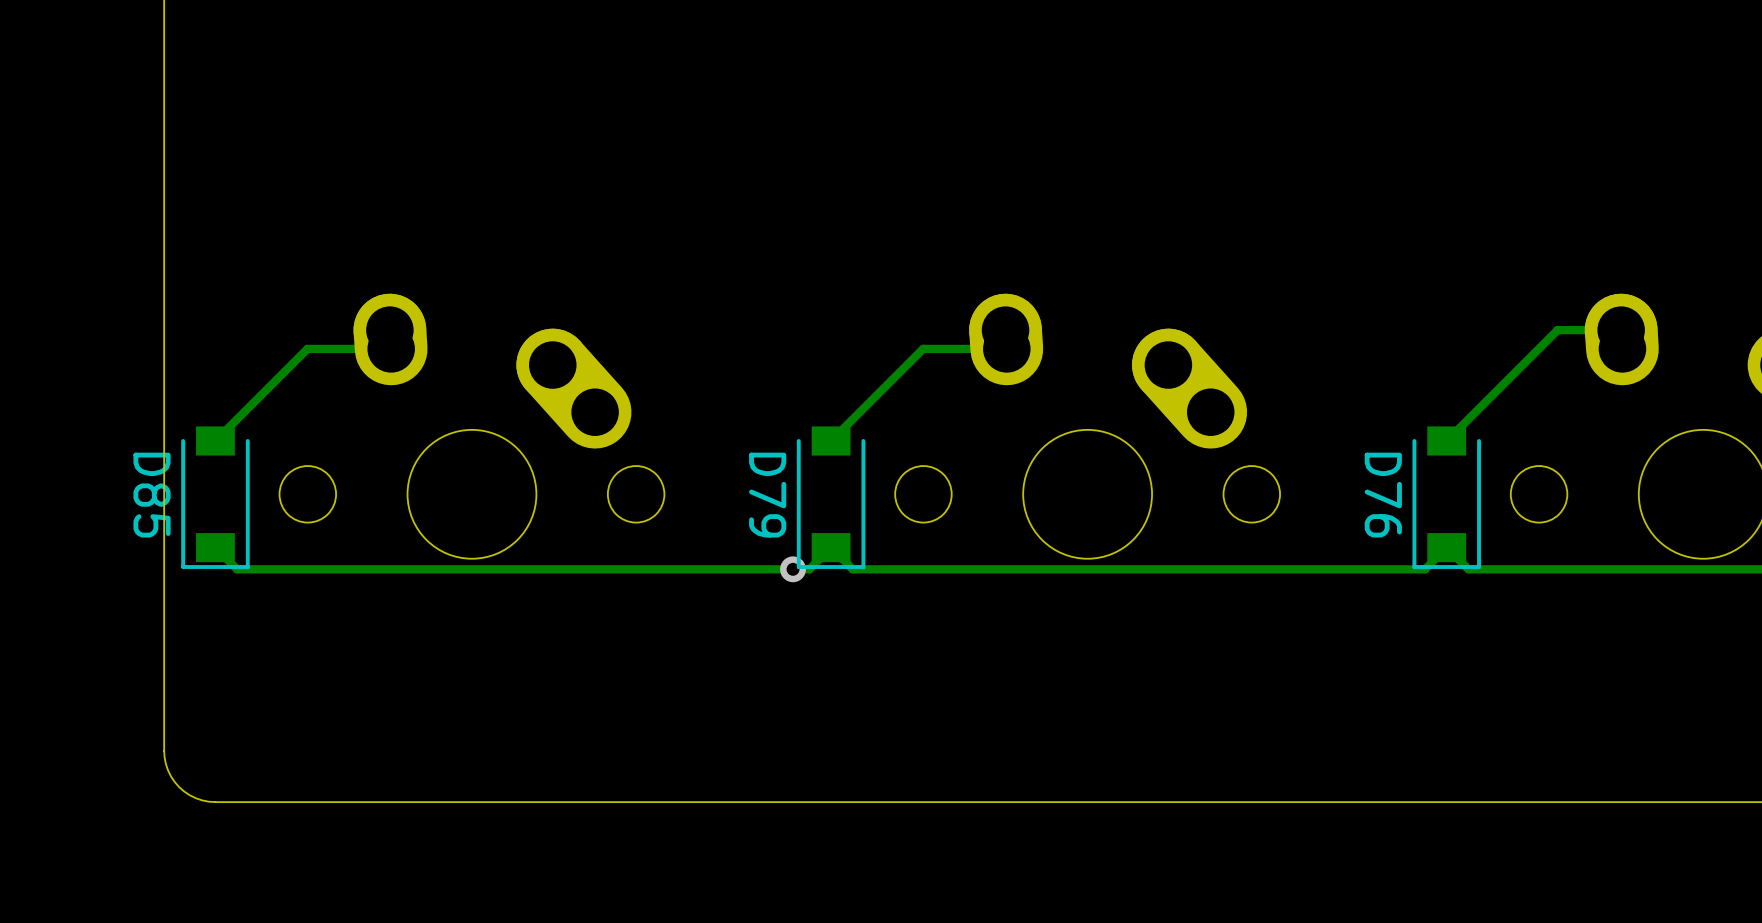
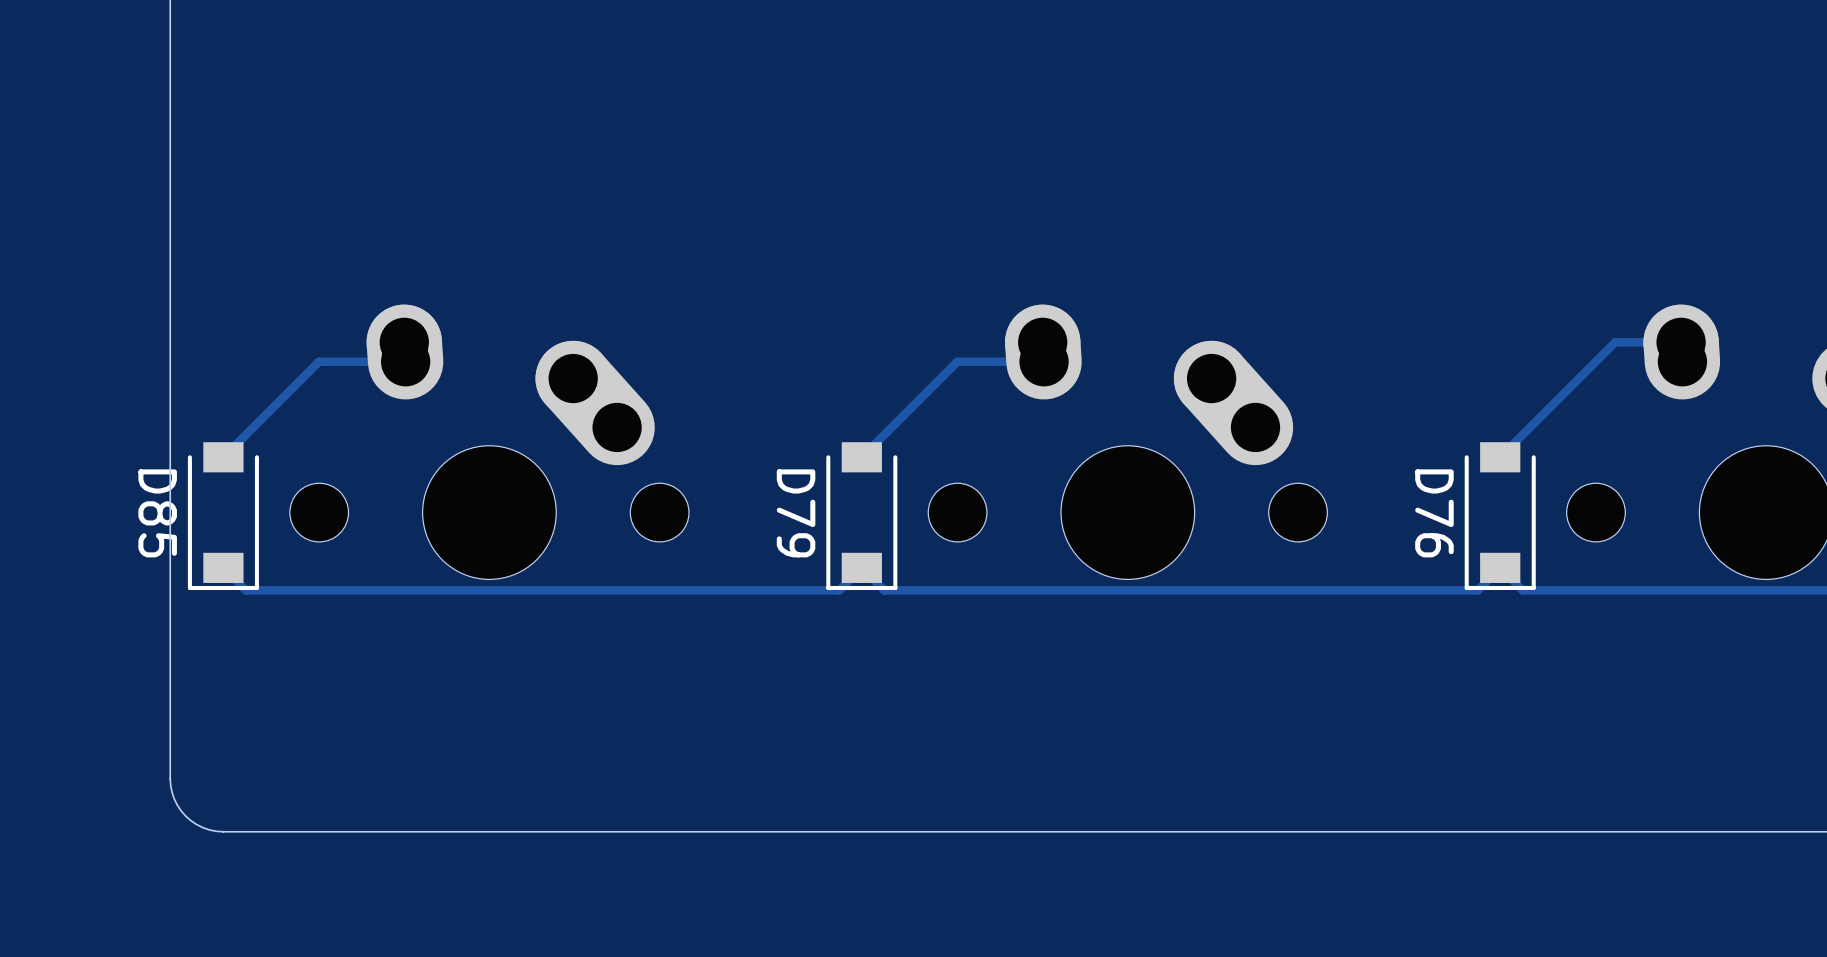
via: (793, 569) -> none

